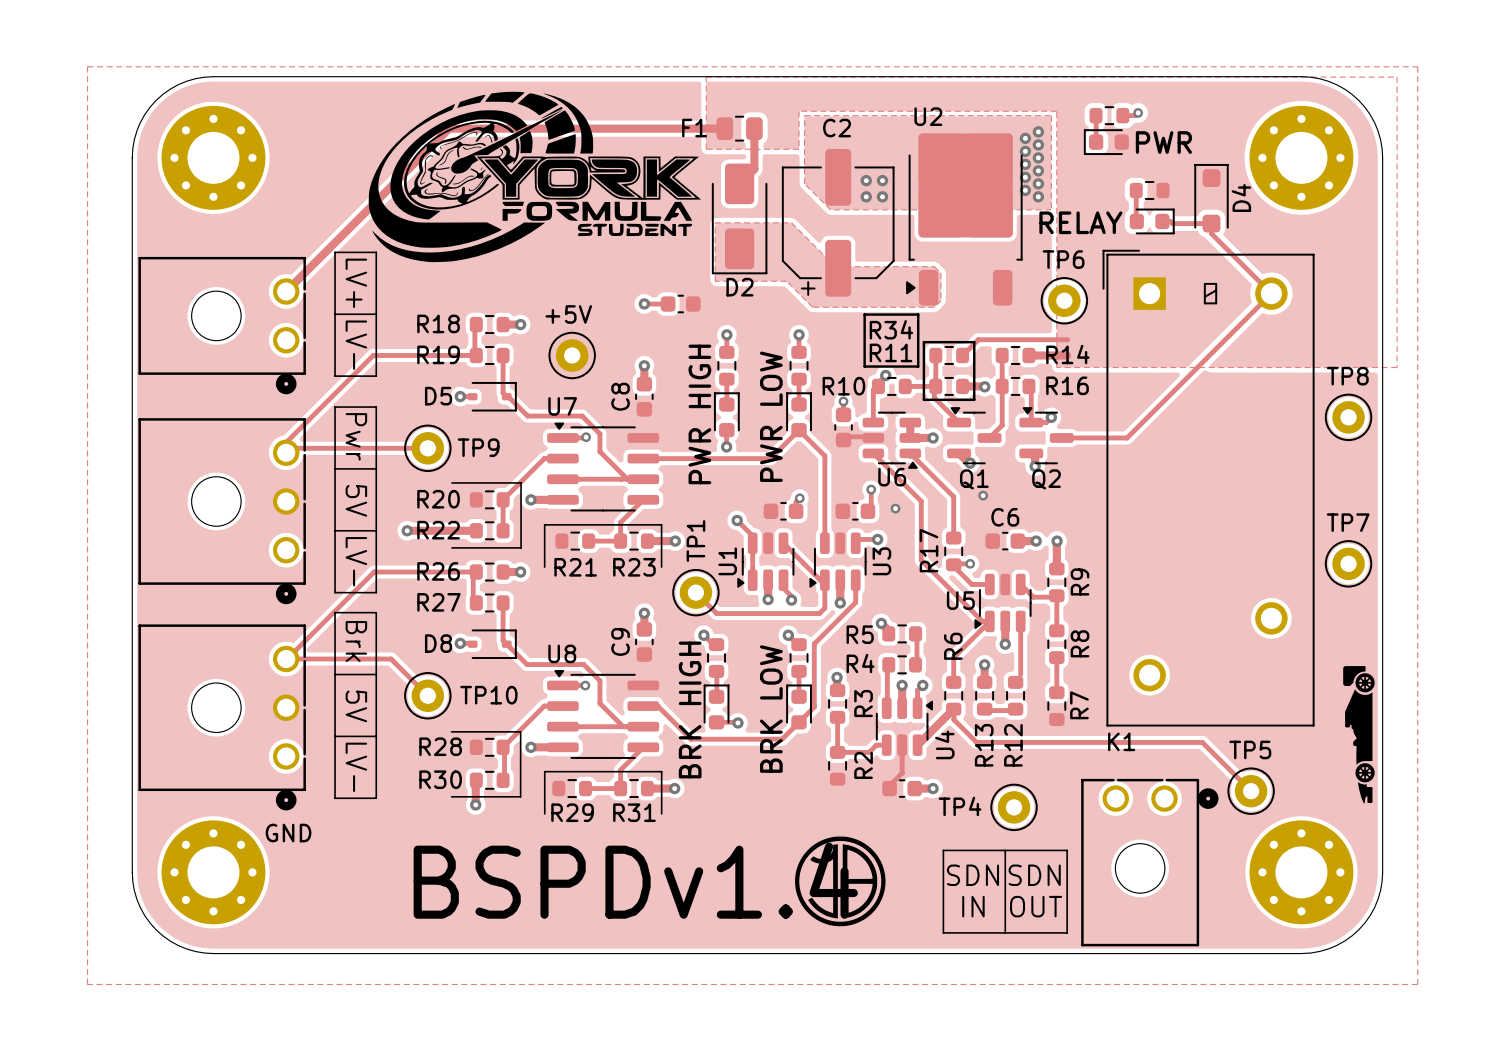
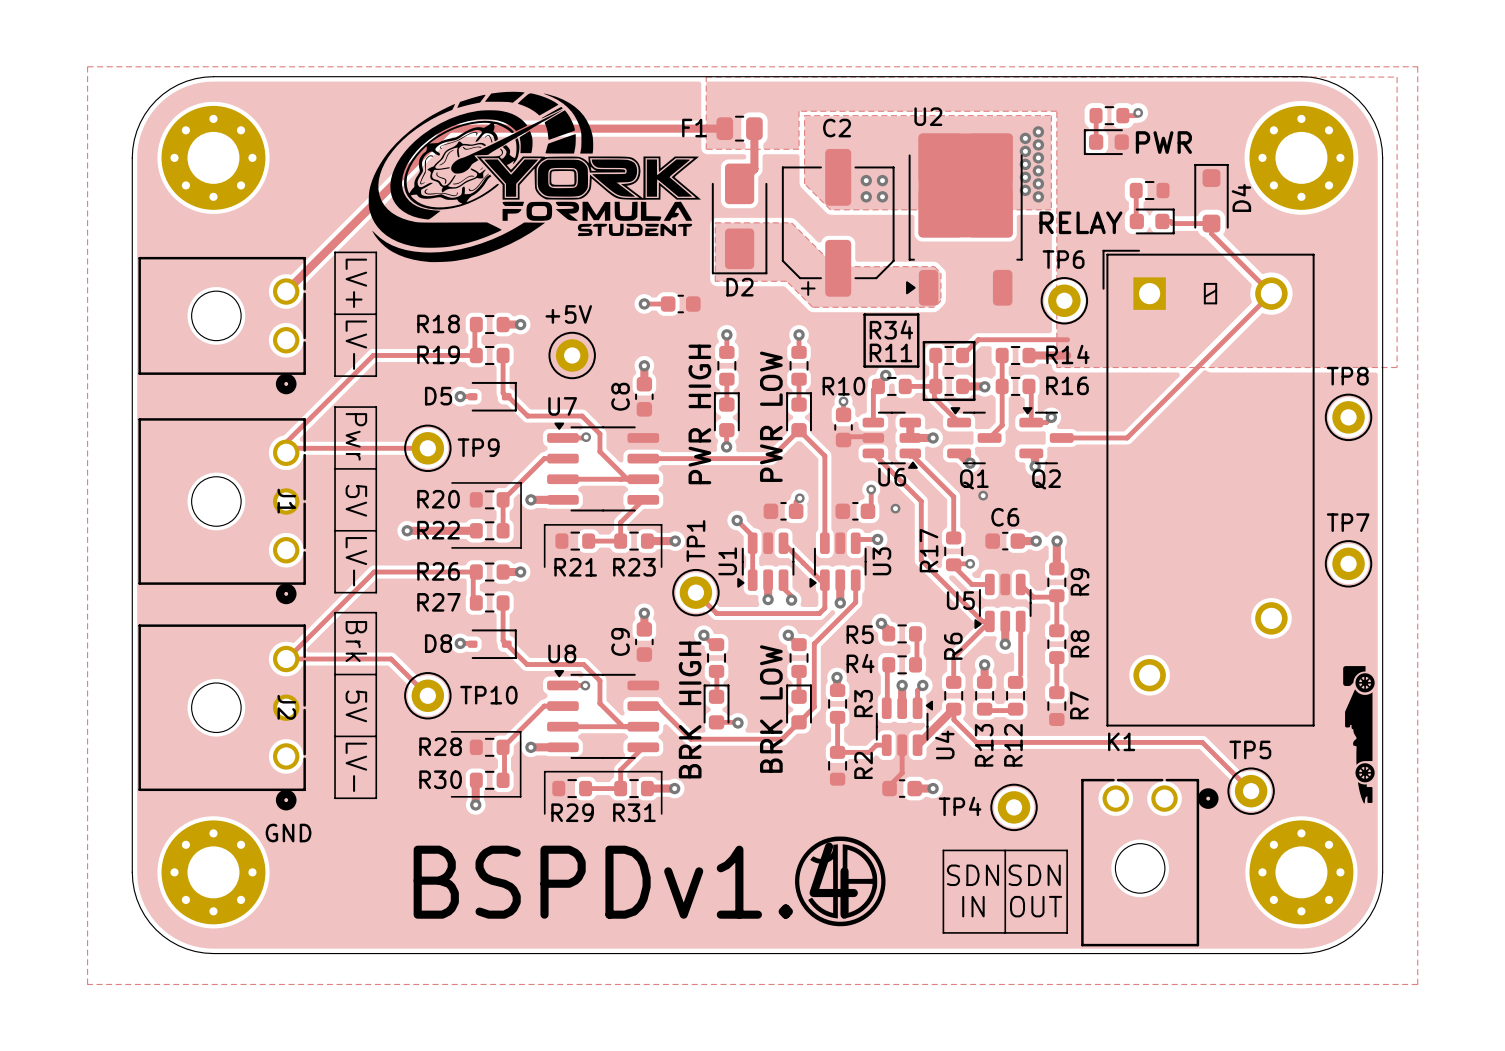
J1 name: none -> J1 (286, 501)
J2 name: none -> J2 (286, 707)

